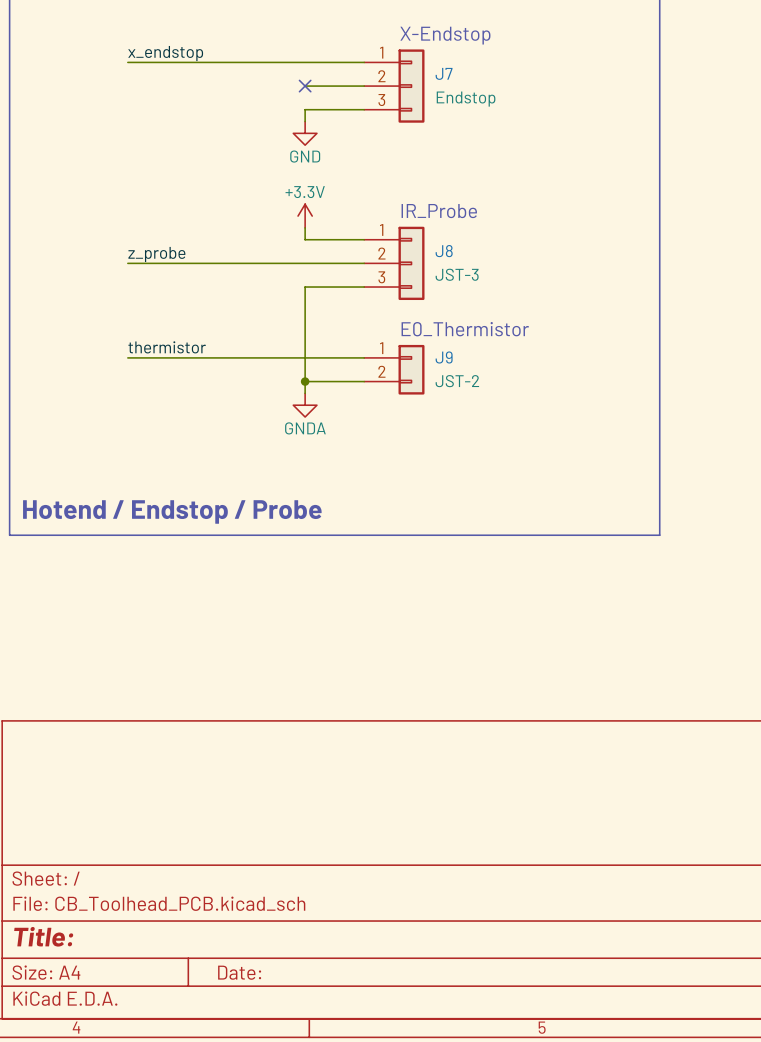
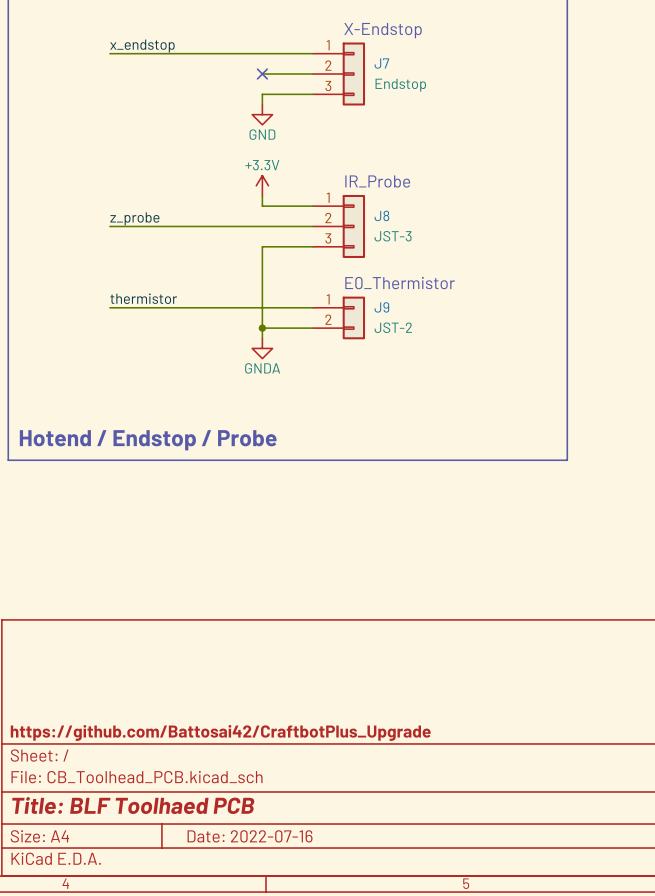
title block: none -> https://github.com/Battosai42/CraftbotPlus_Upgrade (220, 732)
title block: Title: (43, 936) -> Title: BLF Toolhaed PCB (133, 805)
title block: Date: (239, 972) -> Date: 2022-07-16 (250, 836)

